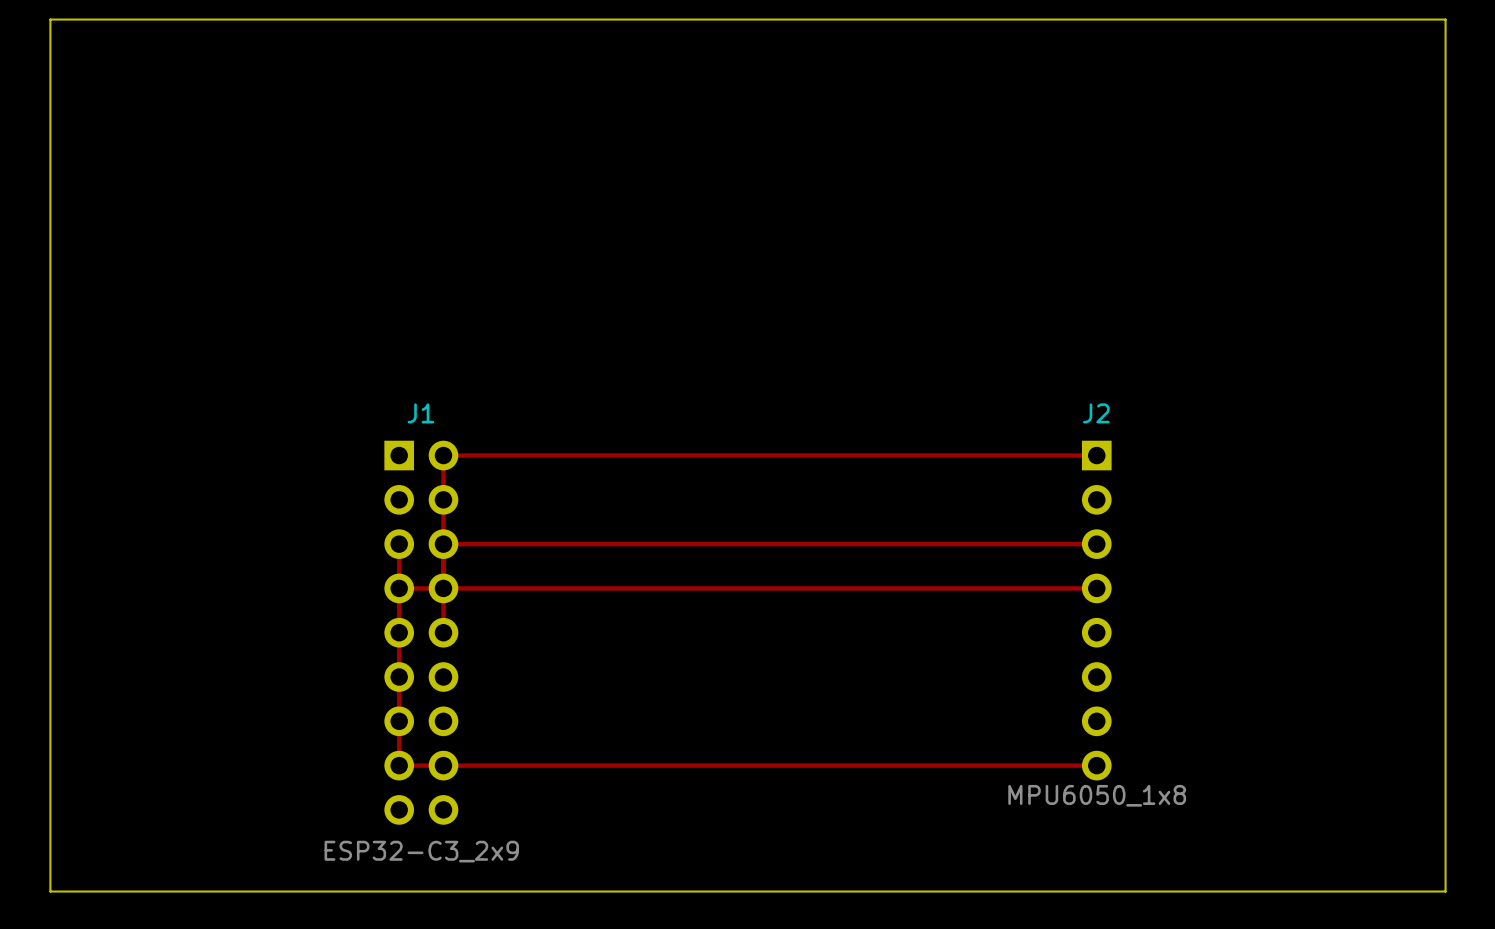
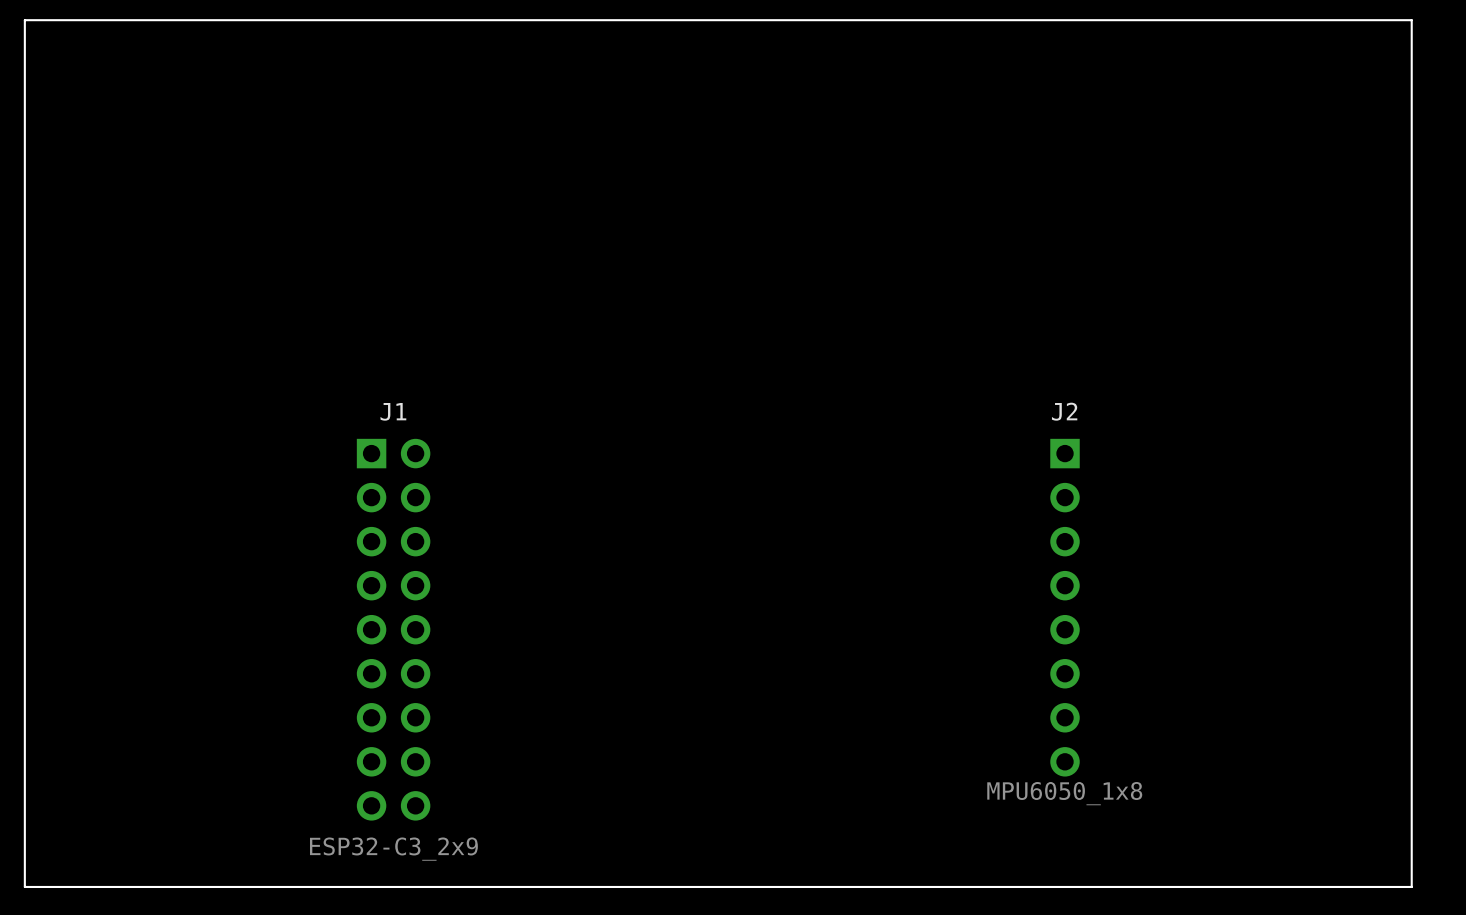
track: (1096, 455) (443, 455) (443, 632) -> none
track: (399, 544) (399, 765) (1096, 765) -> none
track: (443, 544) (1096, 544) -> none
track: (399, 588) (1096, 588) -> none

